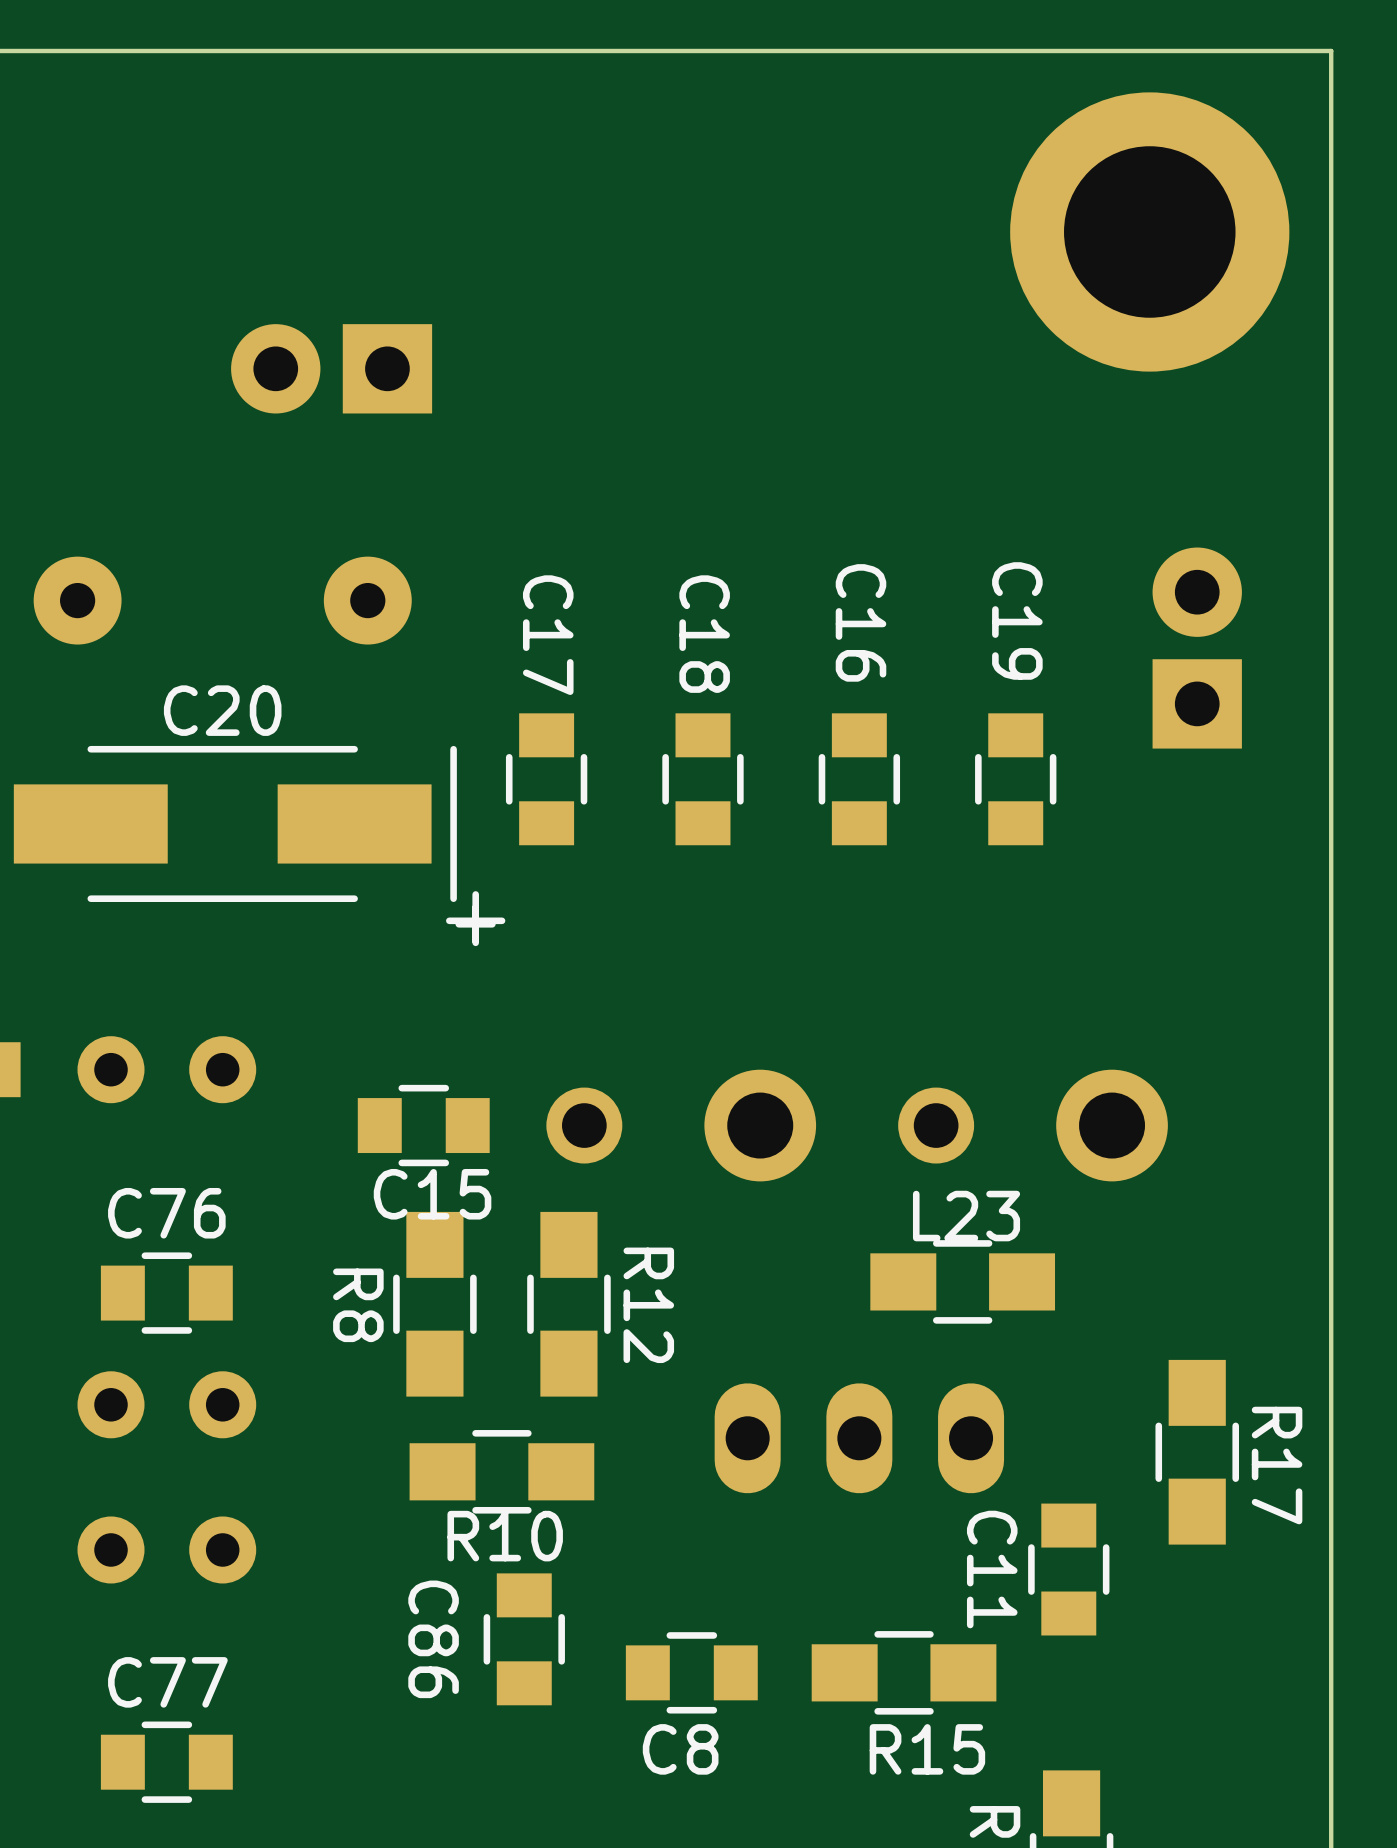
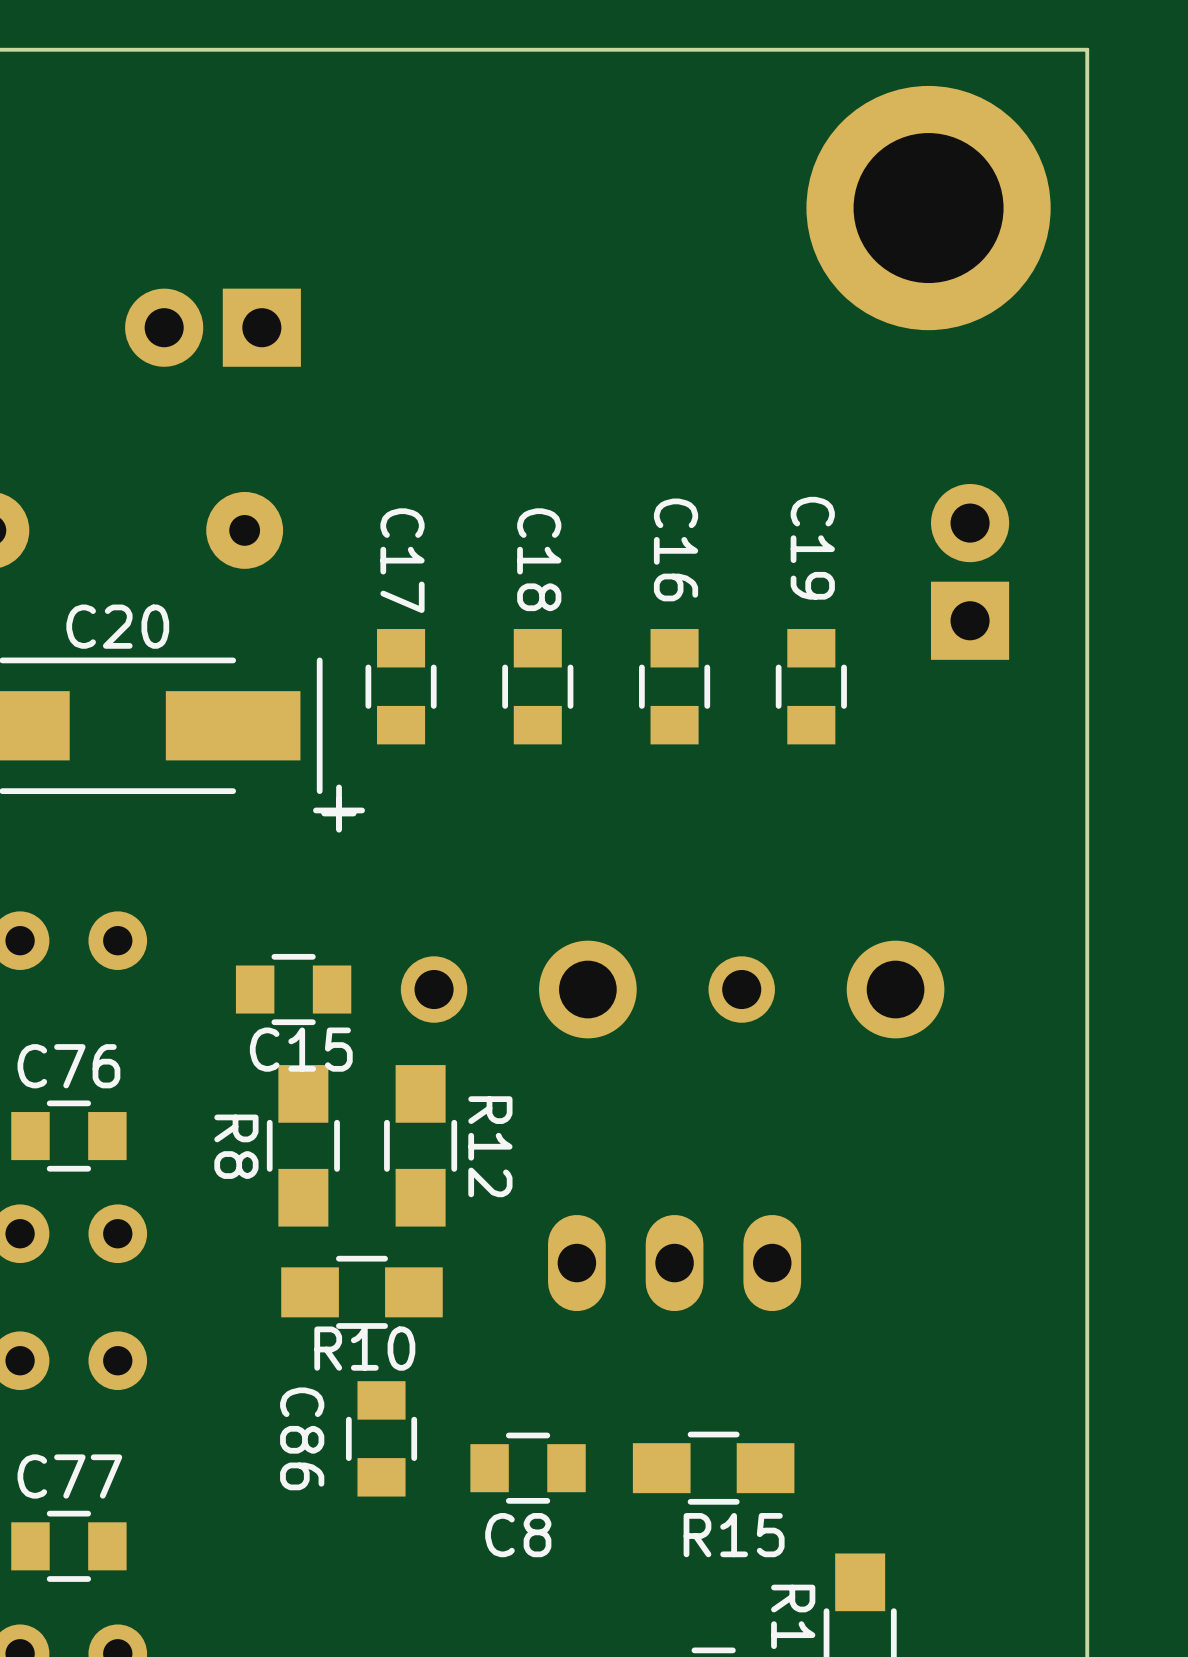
L23: (962, 1281) -> none
R17: (1197, 1452) -> none
C11: (1068, 1569) -> none

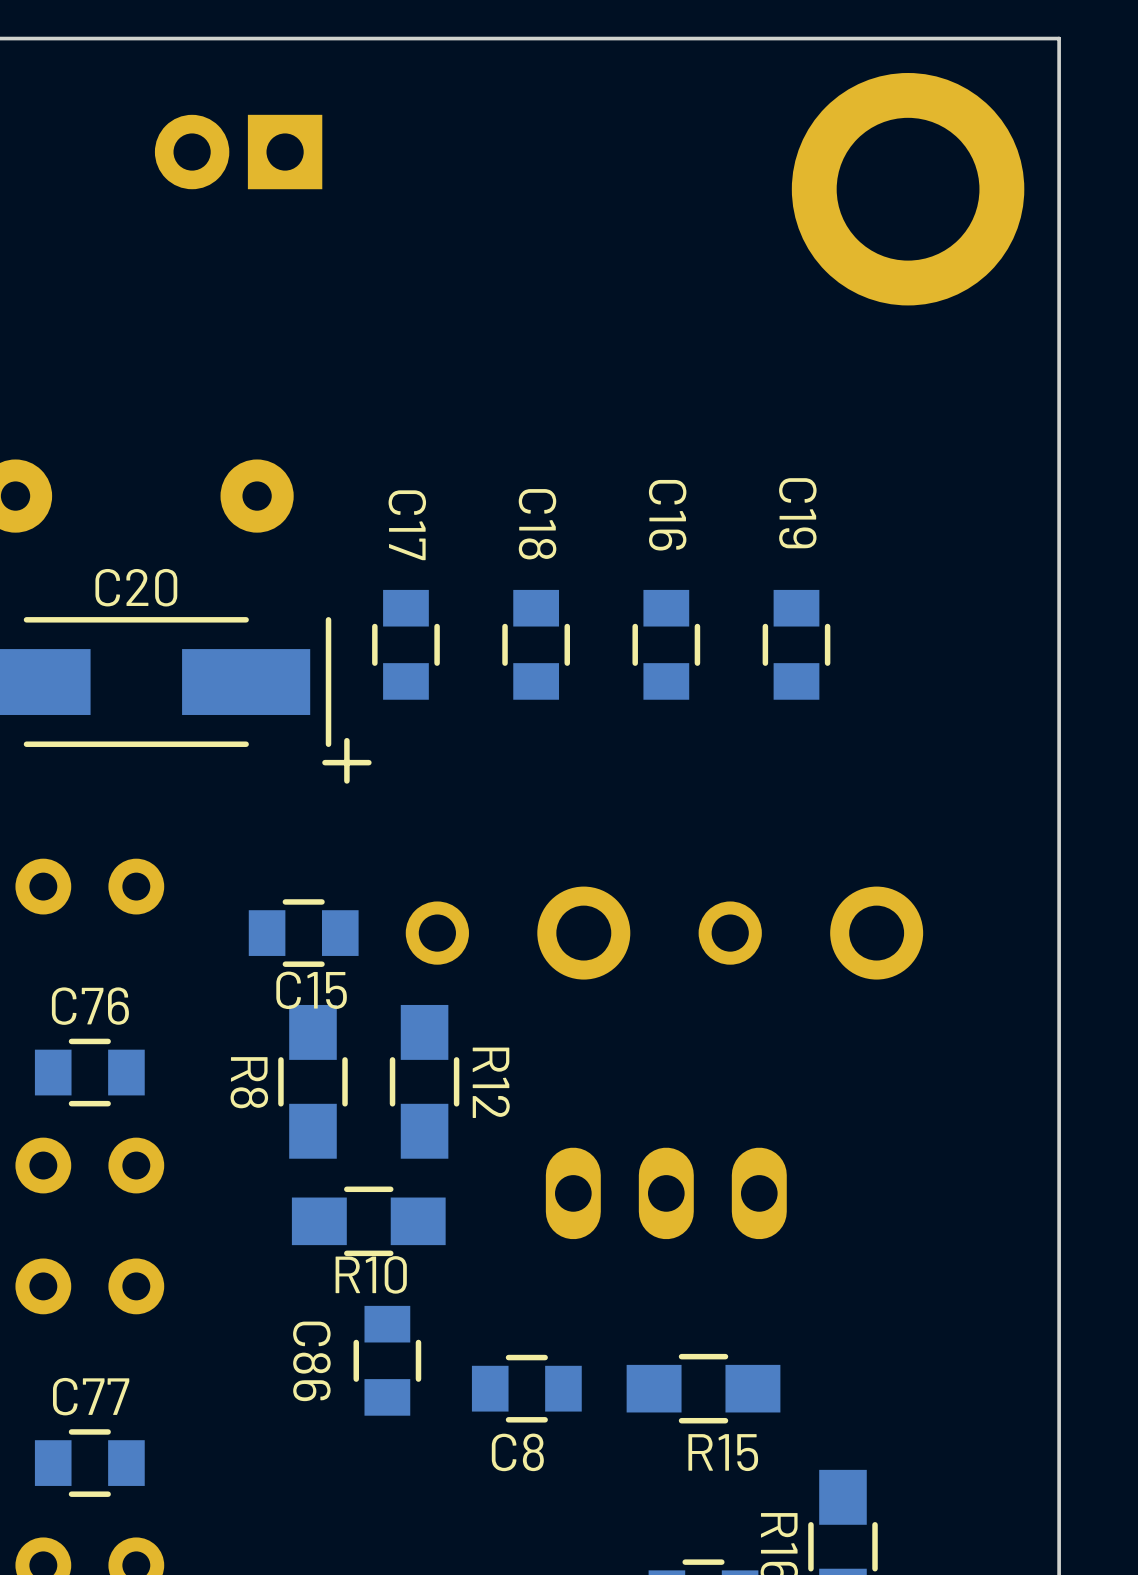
part position: (213, 327) -> (238, 152)
part: (970, 571) -> none

